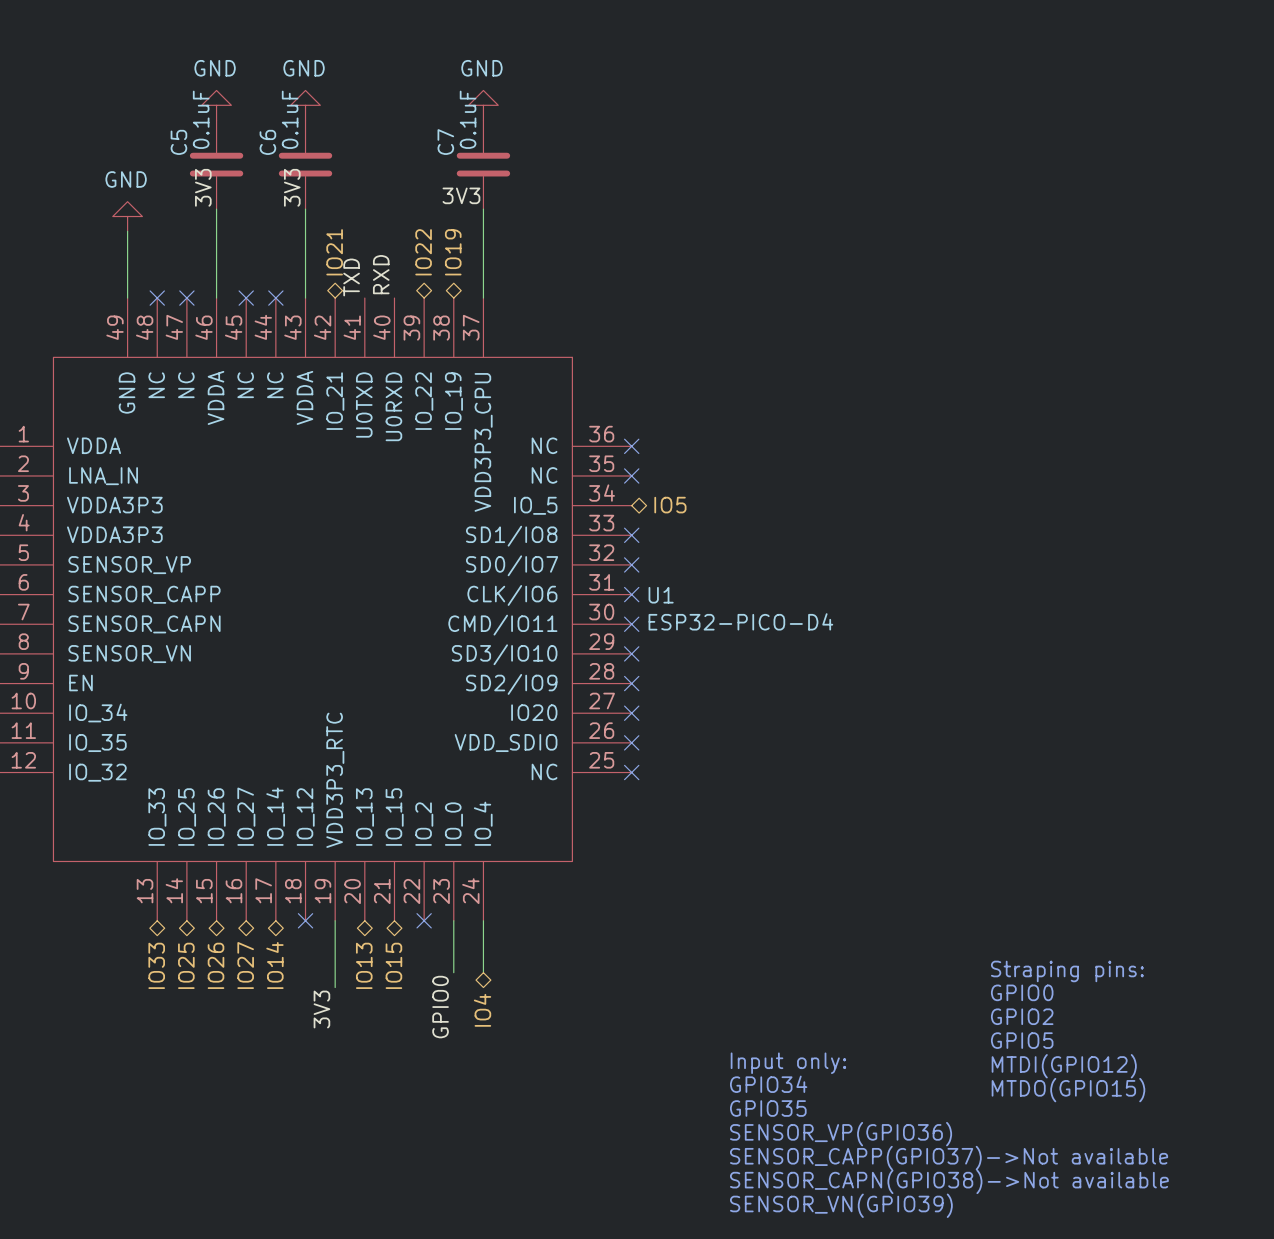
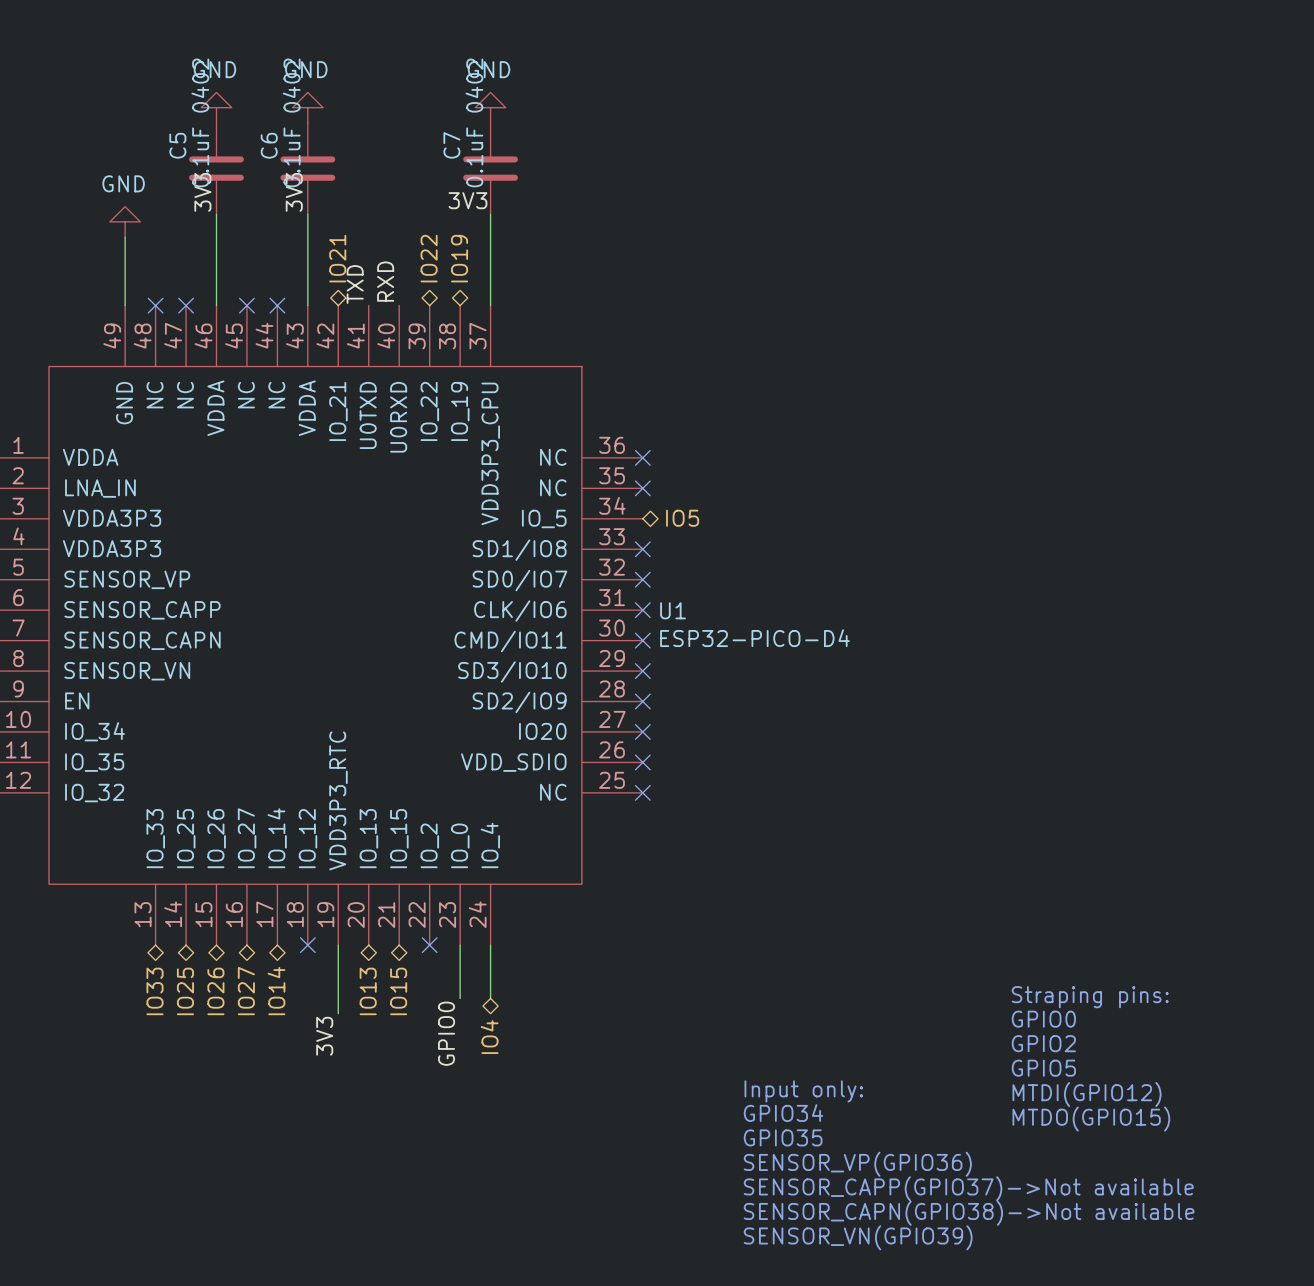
C5 value: 0.1uF (201, 119) -> 0.1uF 0402 (200, 122)
C6 value: 0.1uF (290, 119) -> 0.1uF 0402 (291, 122)
C7 value: 0.1uF (468, 119) -> 0.1uF 0402 (474, 122)

